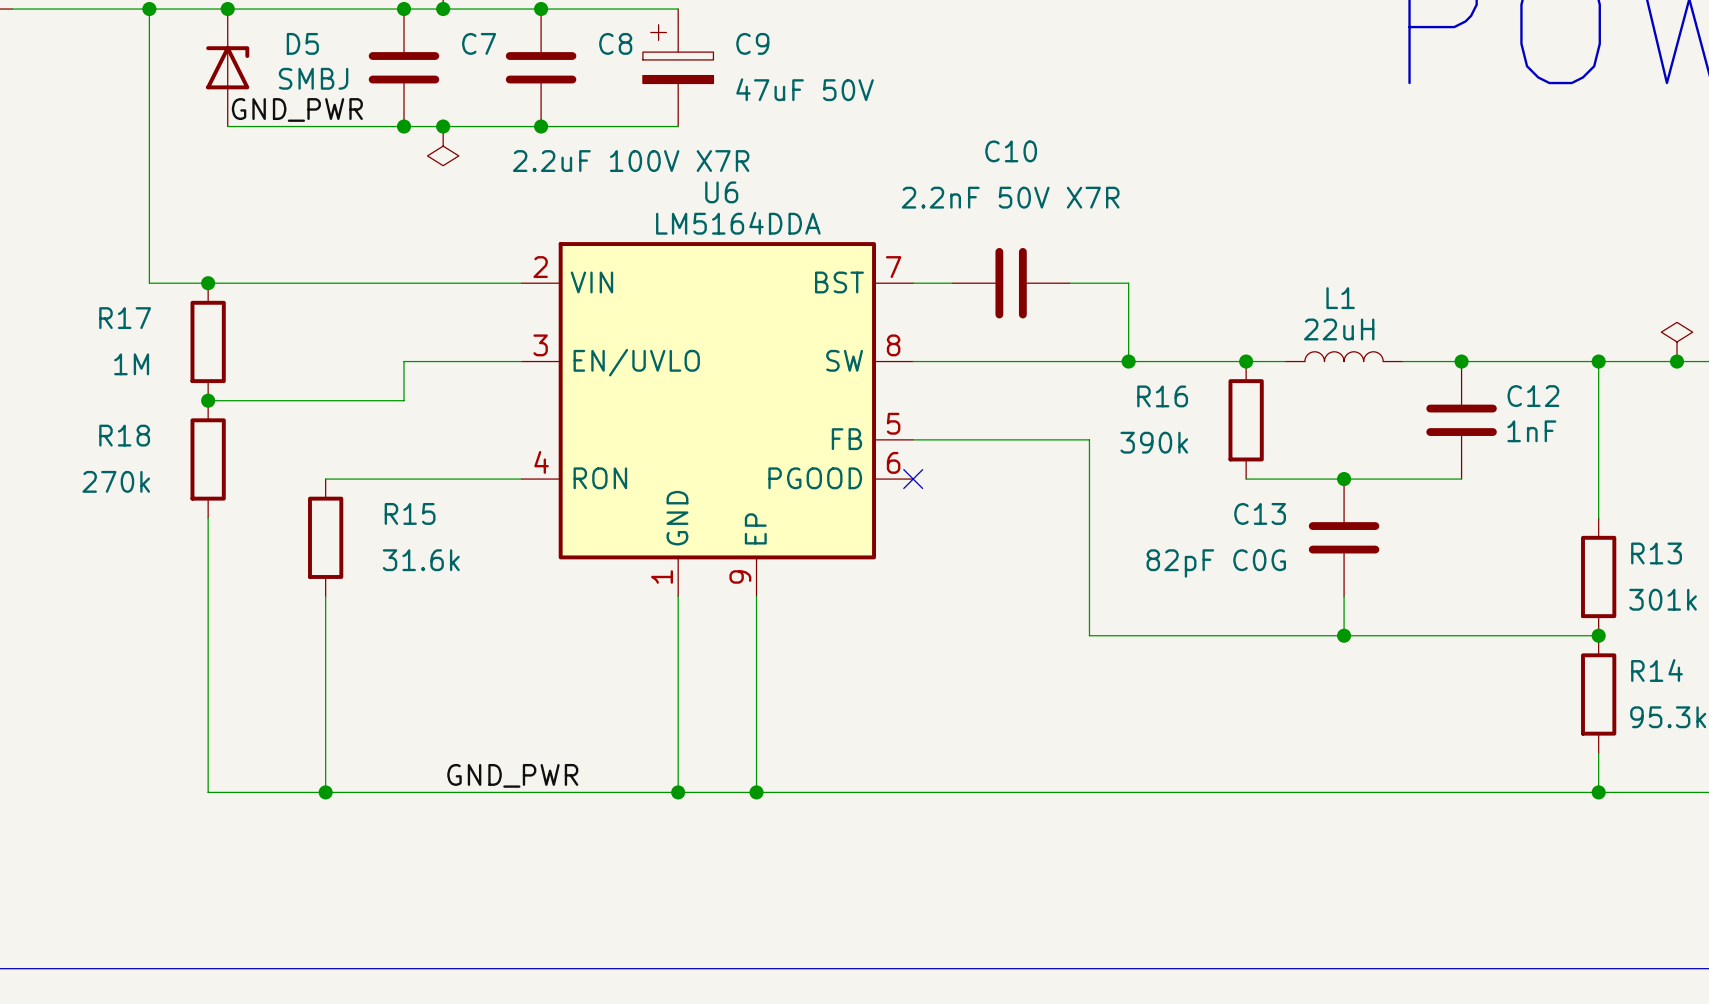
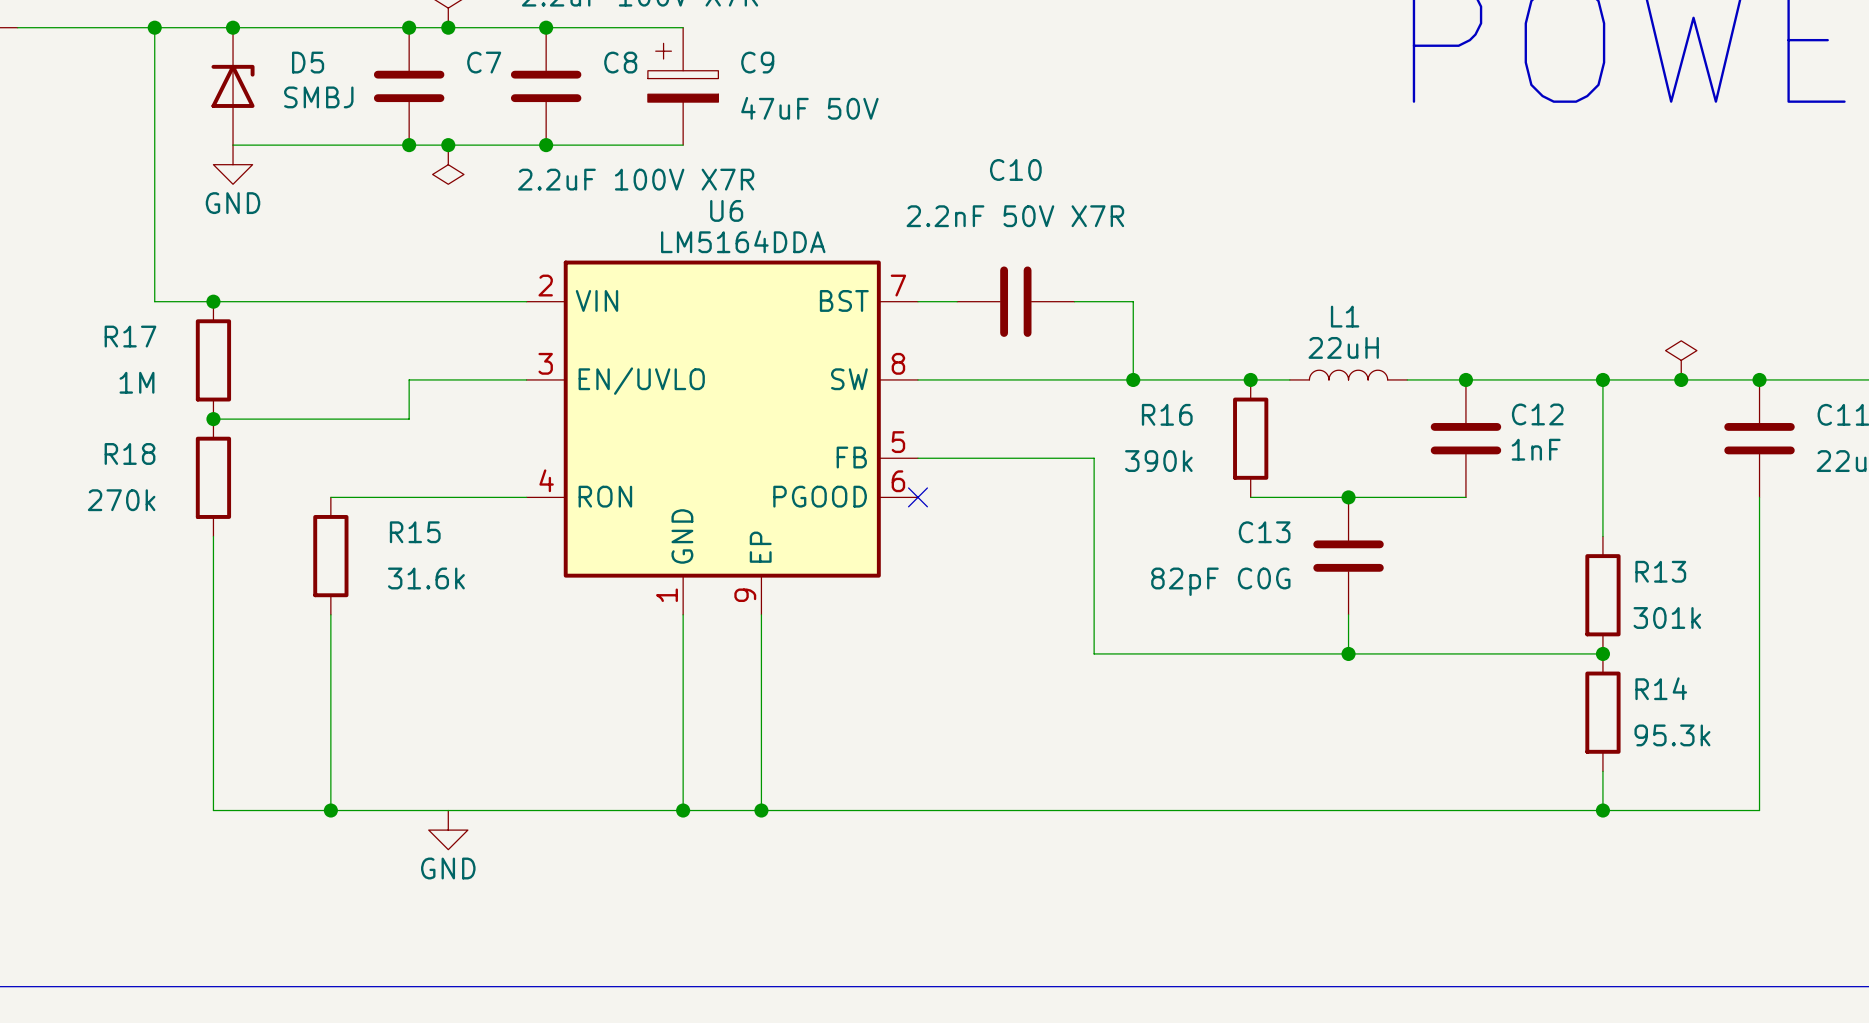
label: GND_PWR (297, 109) -> none
power symbol: none -> GND (233, 164)
label: GND_PWR (512, 775) -> none
power symbol: none -> GND (448, 830)

